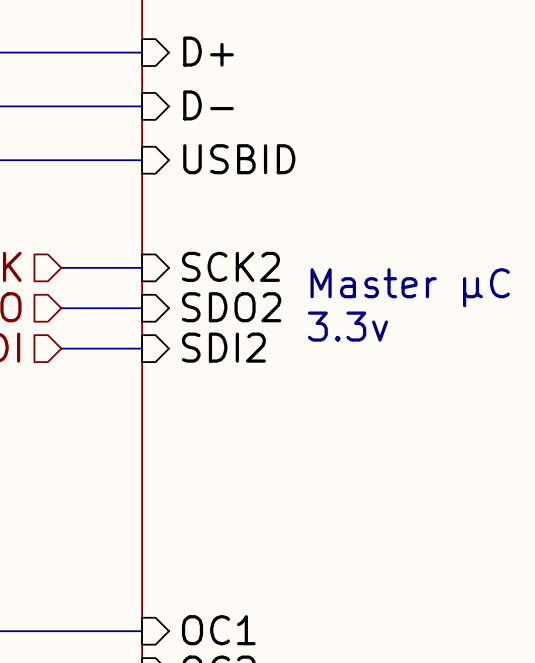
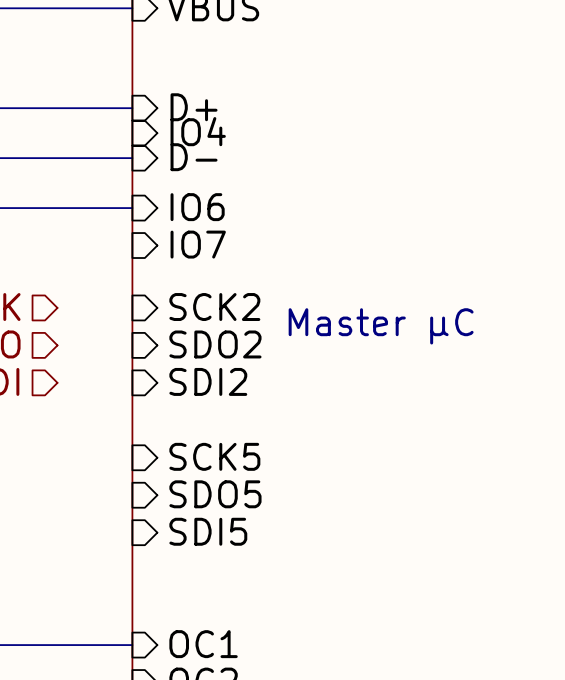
sheet pin: none -> IO4 (198, 131)
sheet pin: USBID (239, 159) -> IO6 (197, 207)
sheet pin: none -> IO7 (198, 244)
wire: (61, 267) (142, 267) -> none
wire: (61, 308) (142, 308) -> none
text: 3.3v (347, 326) -> none
wire: (61, 348) (142, 348) -> none
sheet pin: none -> SCK5 (214, 456)
sheet pin: none -> SDO5 (215, 494)
sheet pin: none -> SDI5 (208, 531)

